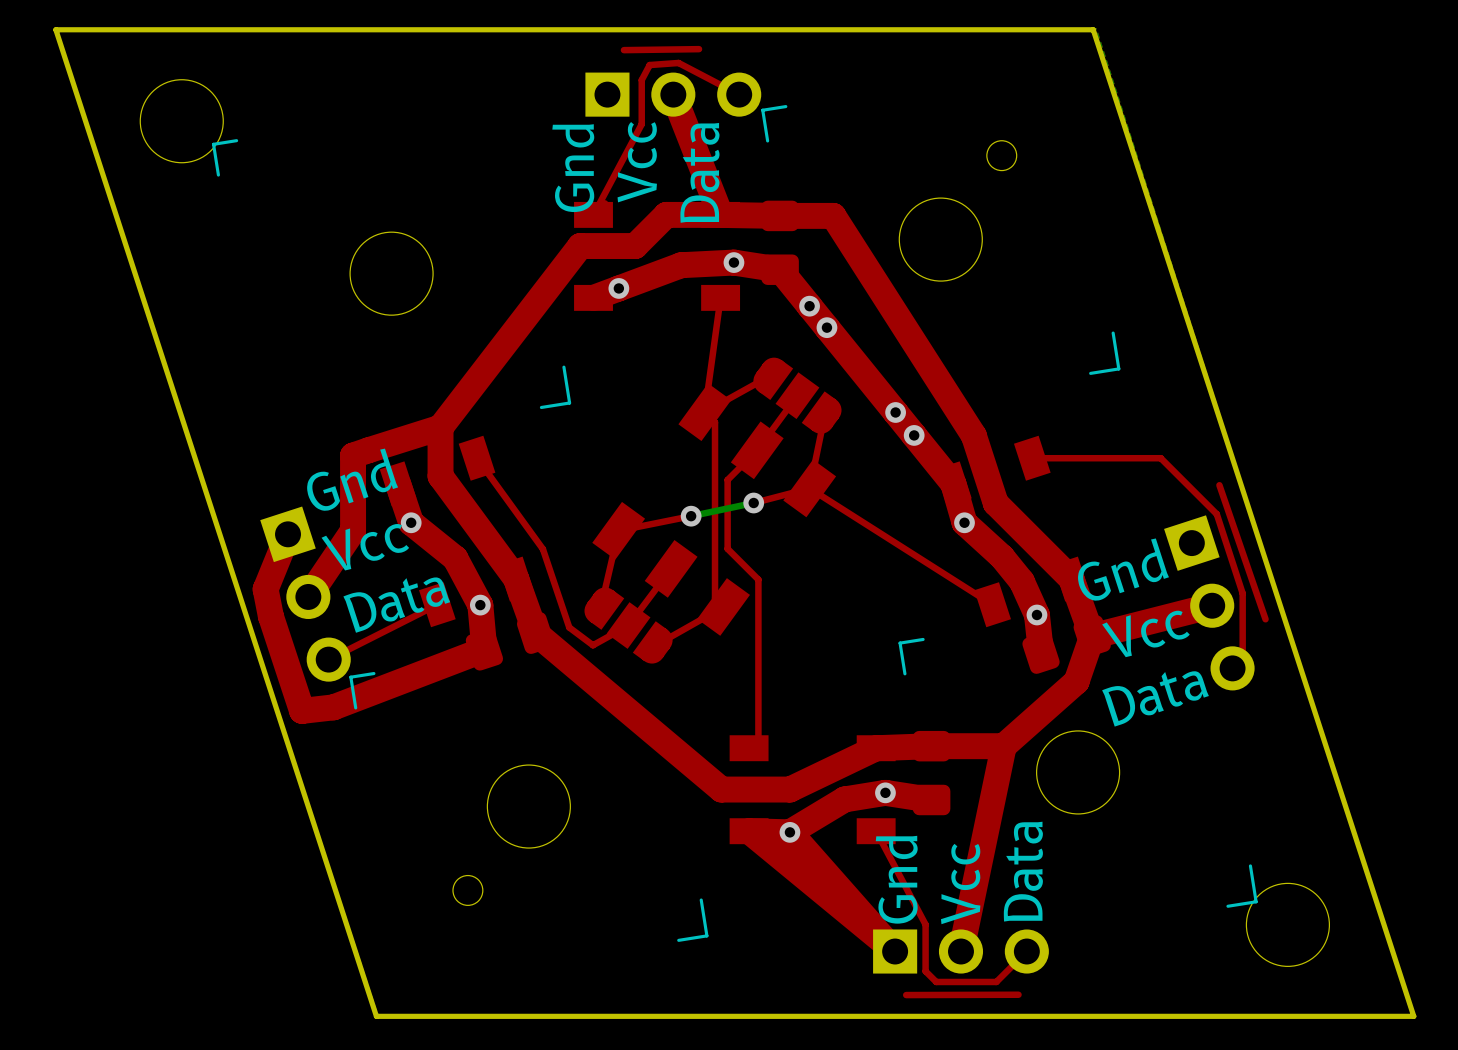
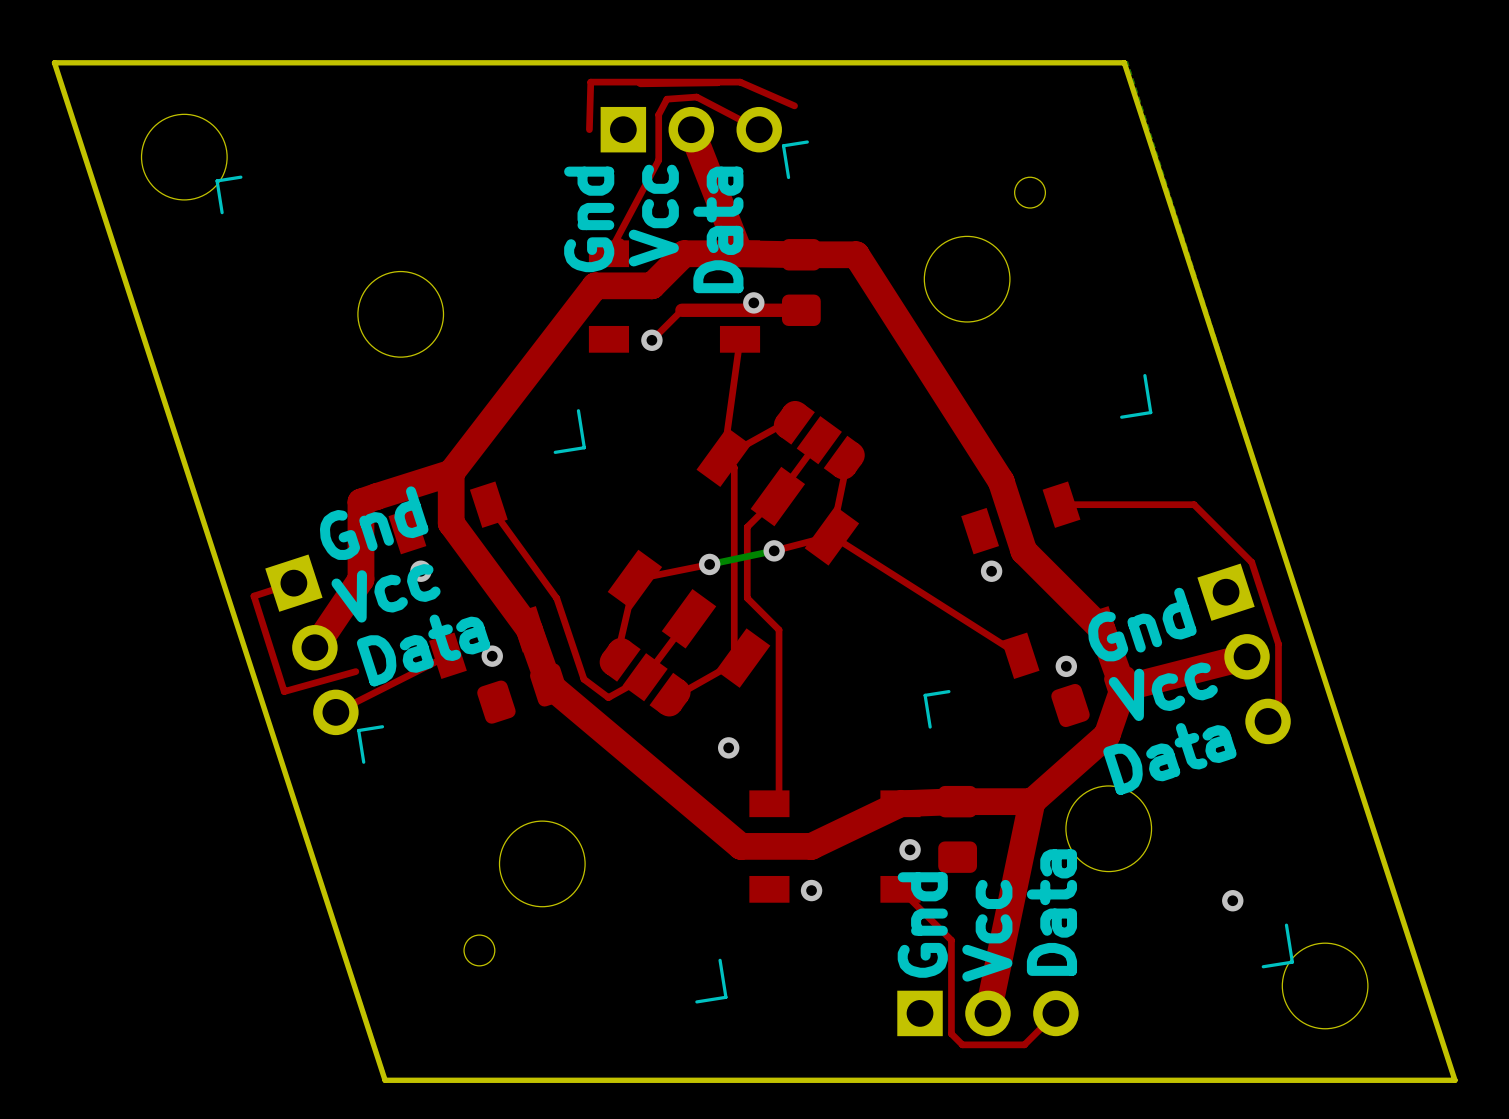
top track: none -> (794, 105) (740, 82) (590, 82) (589, 129)
top track: none -> (801, 310) (681, 310) (651, 340)
via position: (618, 288) -> (651, 340)
top track: (593, 297) (681, 265) (733, 262) (780, 269) (953, 483) (964, 522) (1002, 557) (1021, 581) (1036, 614) (1041, 652) -> none
via: (809, 306) -> none
via: (826, 327) -> none
via: (895, 412) -> none
via: (914, 435) -> none
top track: (398, 483) (411, 522) (455, 558) (480, 605) (484, 649) (333, 707) (302, 710) (270, 616) (265, 589) (288, 534) -> (355, 671) (284, 691) (253, 596) (293, 583)
top track: (1219, 485) (1265, 619) -> none
via: none -> (728, 747)
top track: (931, 799) (885, 792) (844, 799) (789, 832) -> none
top track: (876, 831) (925, 924) -> (900, 889) (951, 940) (951, 985)
top track: (789, 832) (749, 831) (895, 951) (789, 832) -> none
via: none -> (1232, 900)
top track: (1018, 994) (906, 995) -> none

